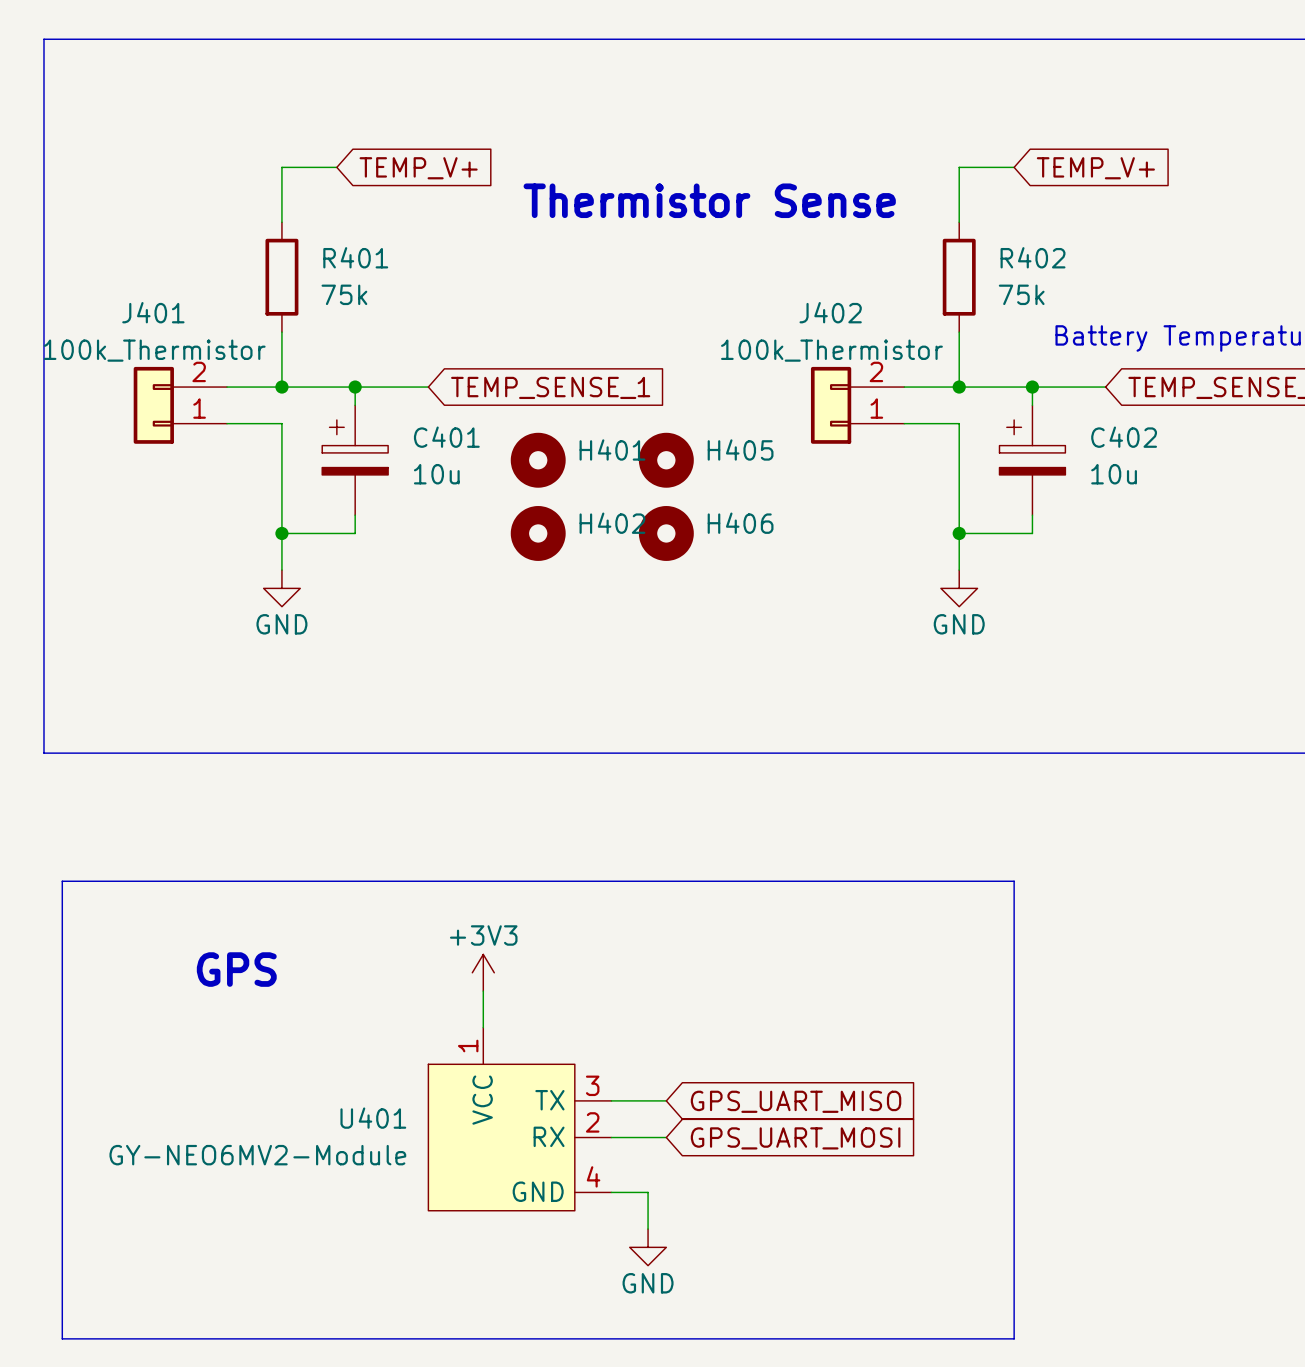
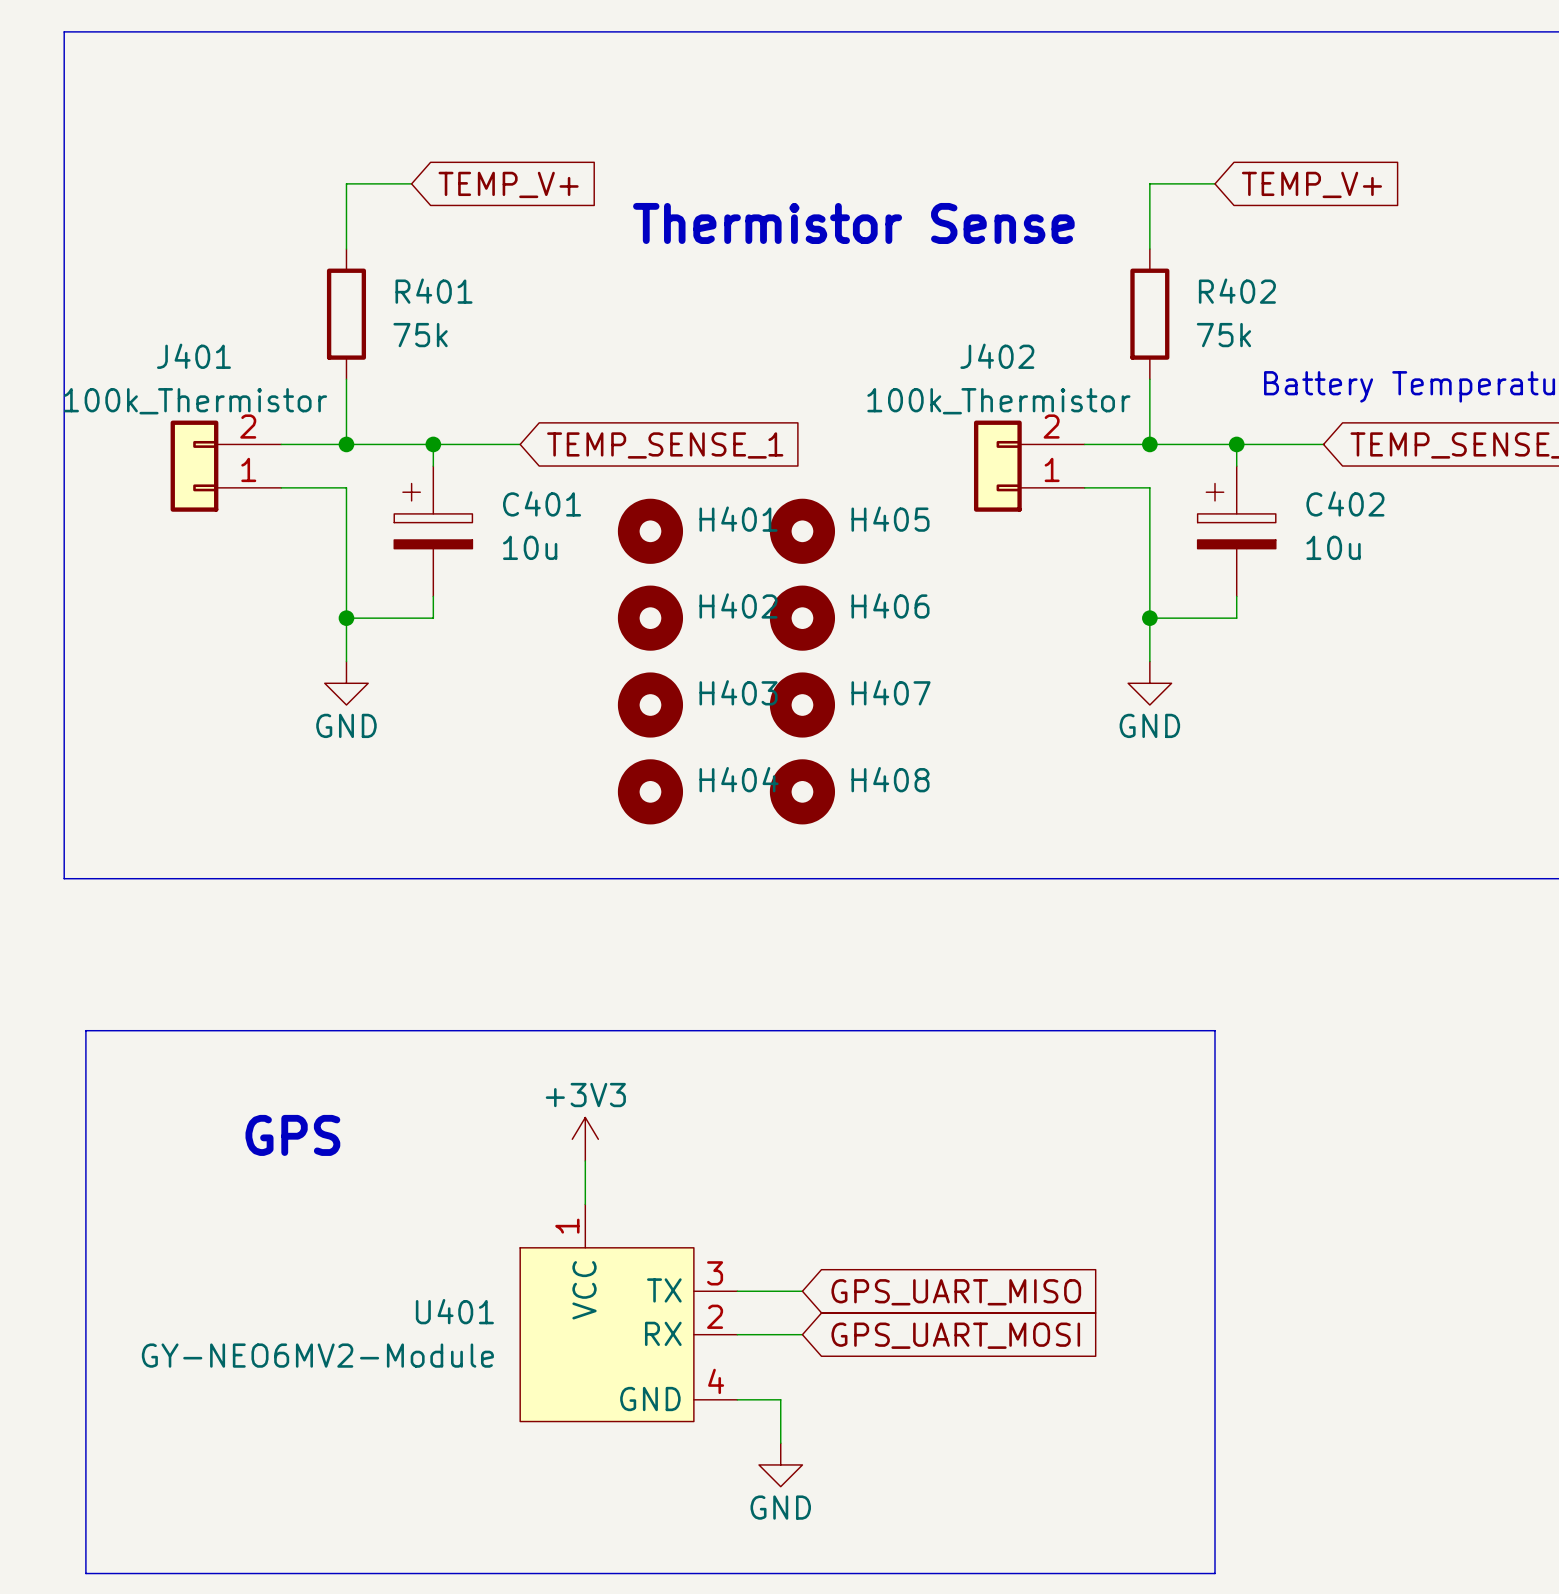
H403: none -> (650, 705)
H407: none -> (802, 705)
H404: none -> (650, 791)
H408: none -> (802, 791)

